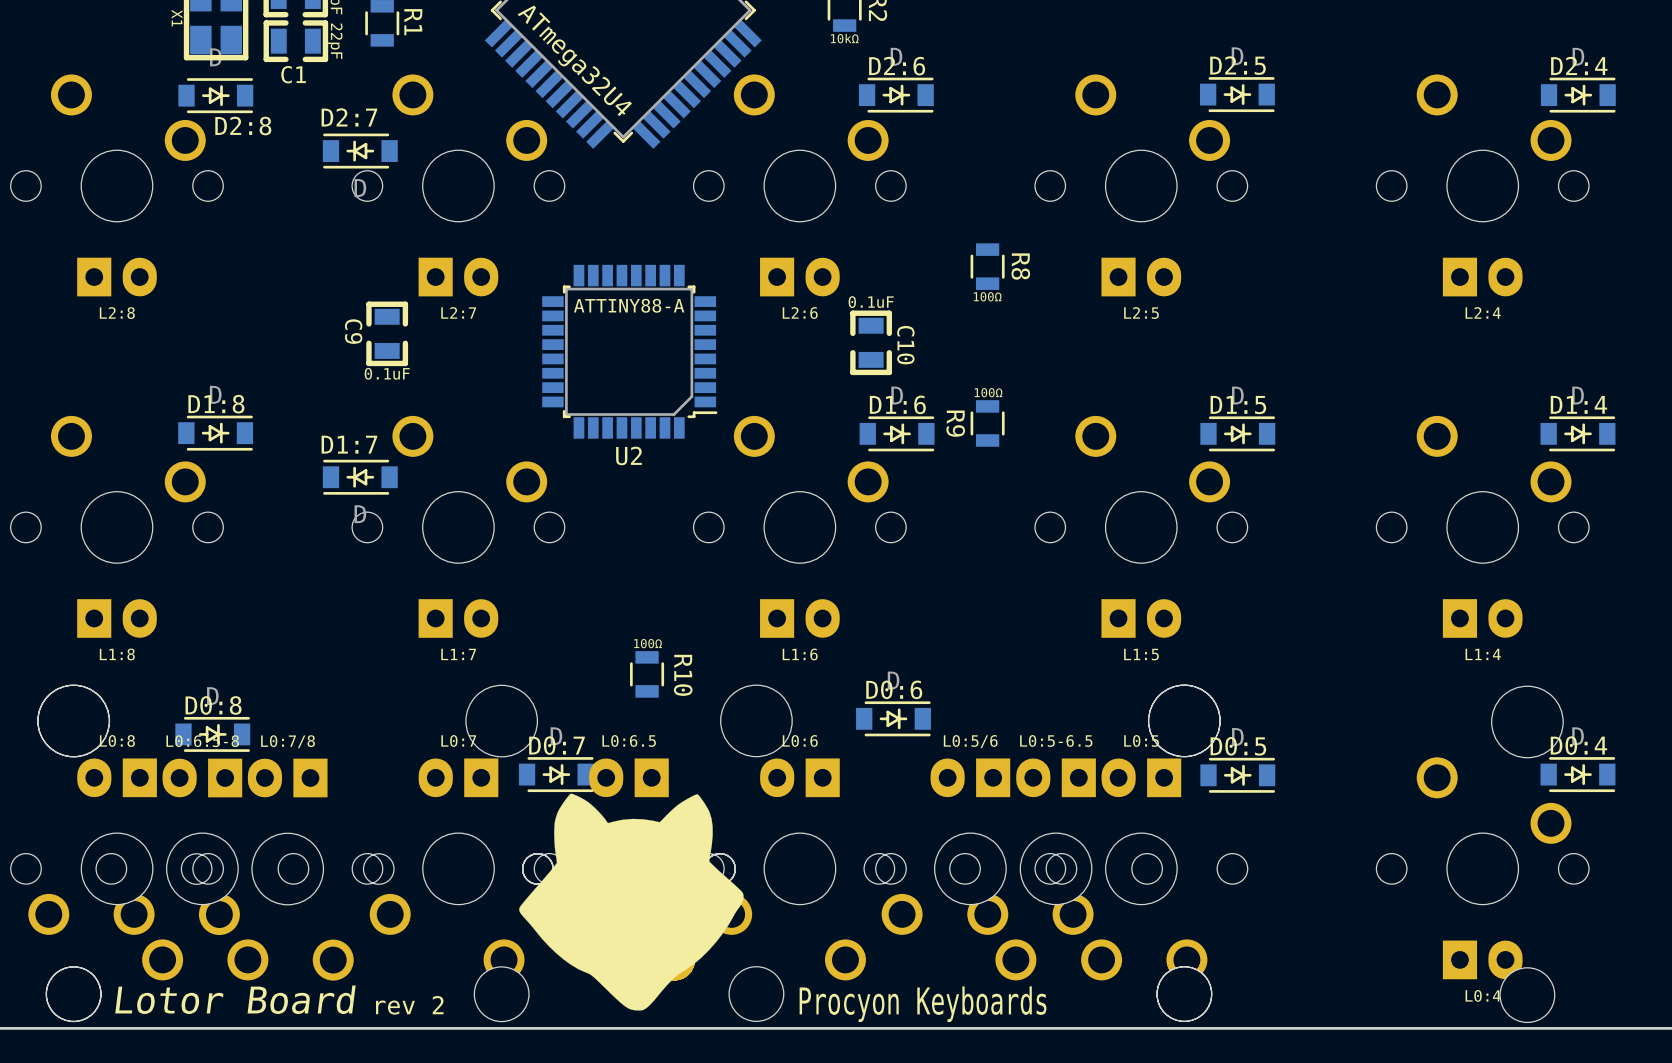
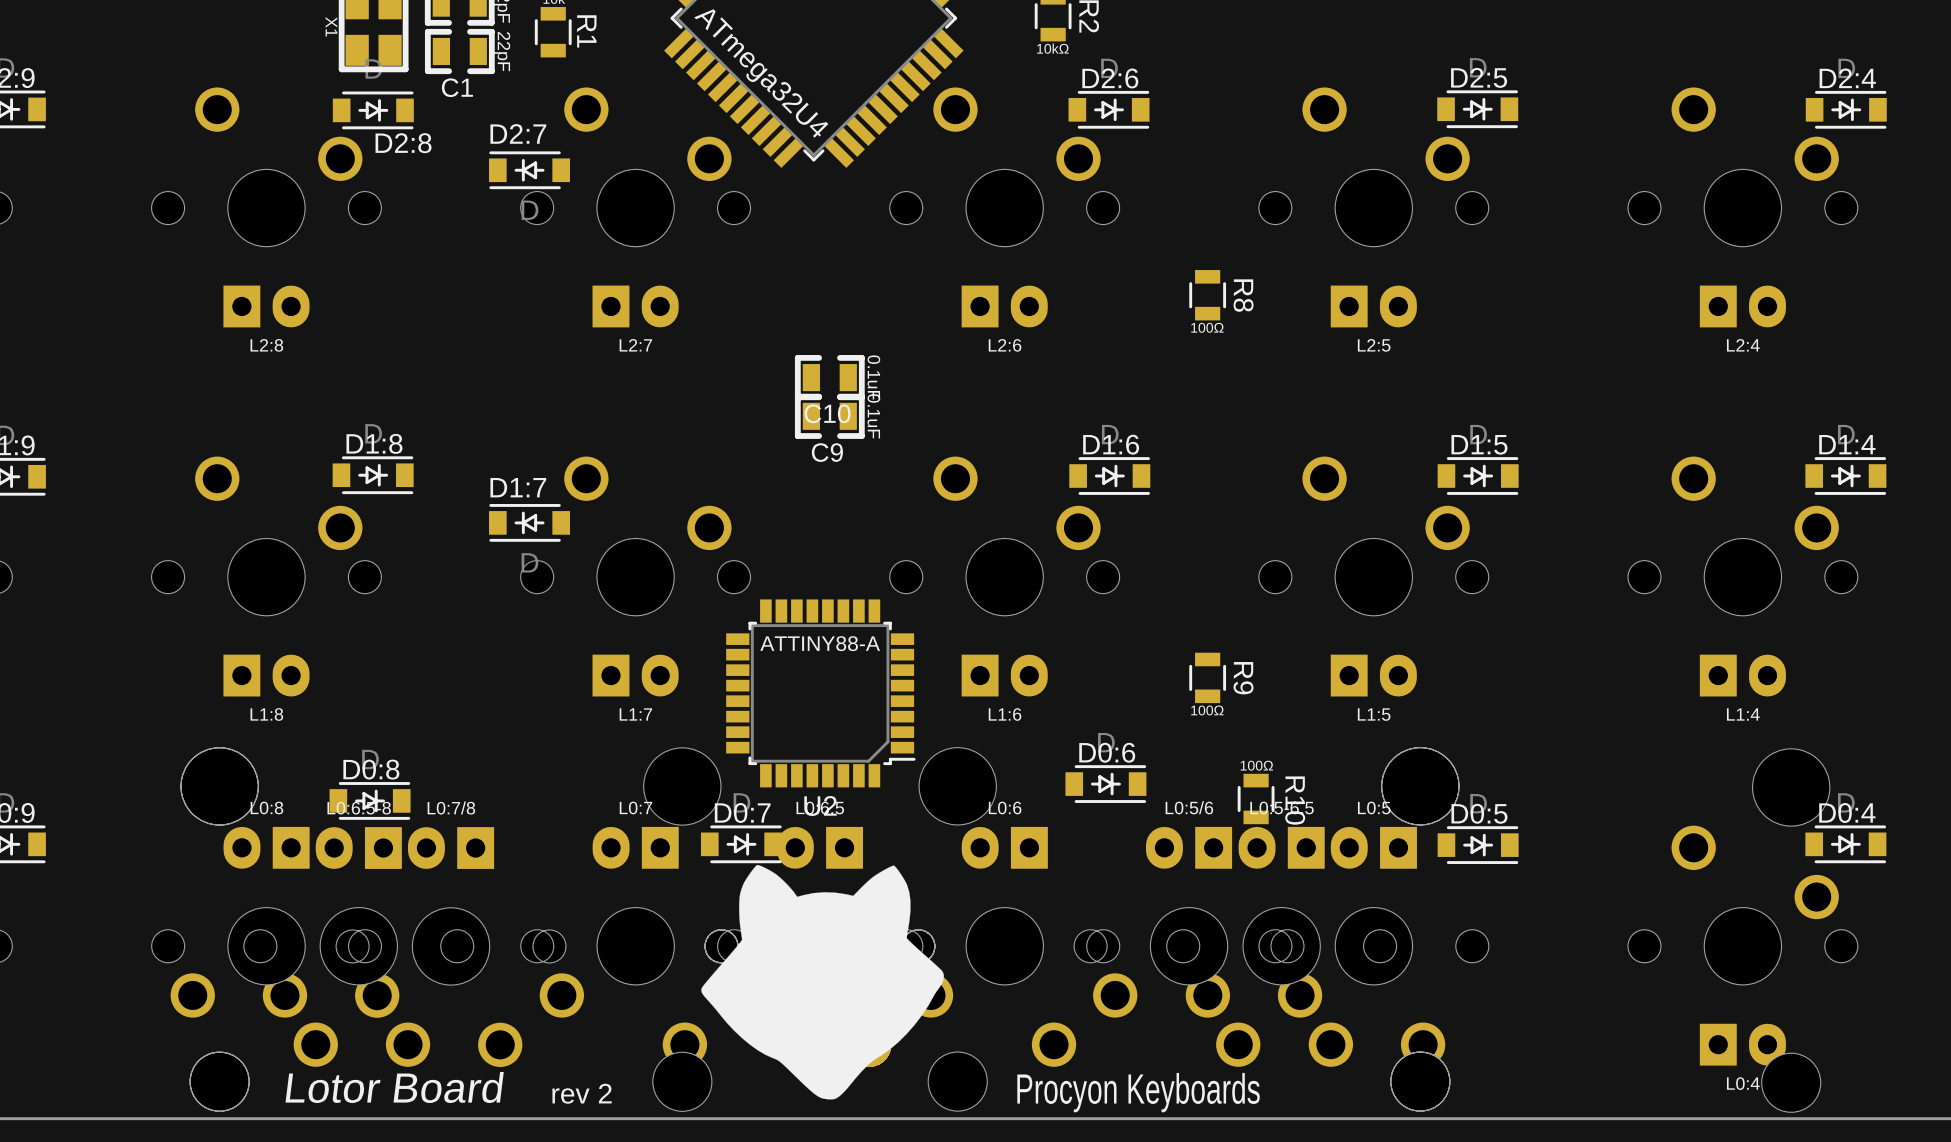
C9 rotation: 0° (387, 333) -> 90° counterclockwise (829, 416)
C9 position: (387, 333) -> (829, 416)
C10 rotation: 0° (871, 342) -> 90° clockwise (829, 377)
C10 position: (871, 342) -> (829, 377)
U2 position: (629, 351) -> (820, 693)
R9 value position: 100Ω (988, 392) -> 100Ω (1207, 710)
R9 name position: R9 (955, 423) -> R9 (1243, 678)
R9 position: (987, 423) -> (1207, 677)
R10 position: (647, 674) -> (1256, 798)

